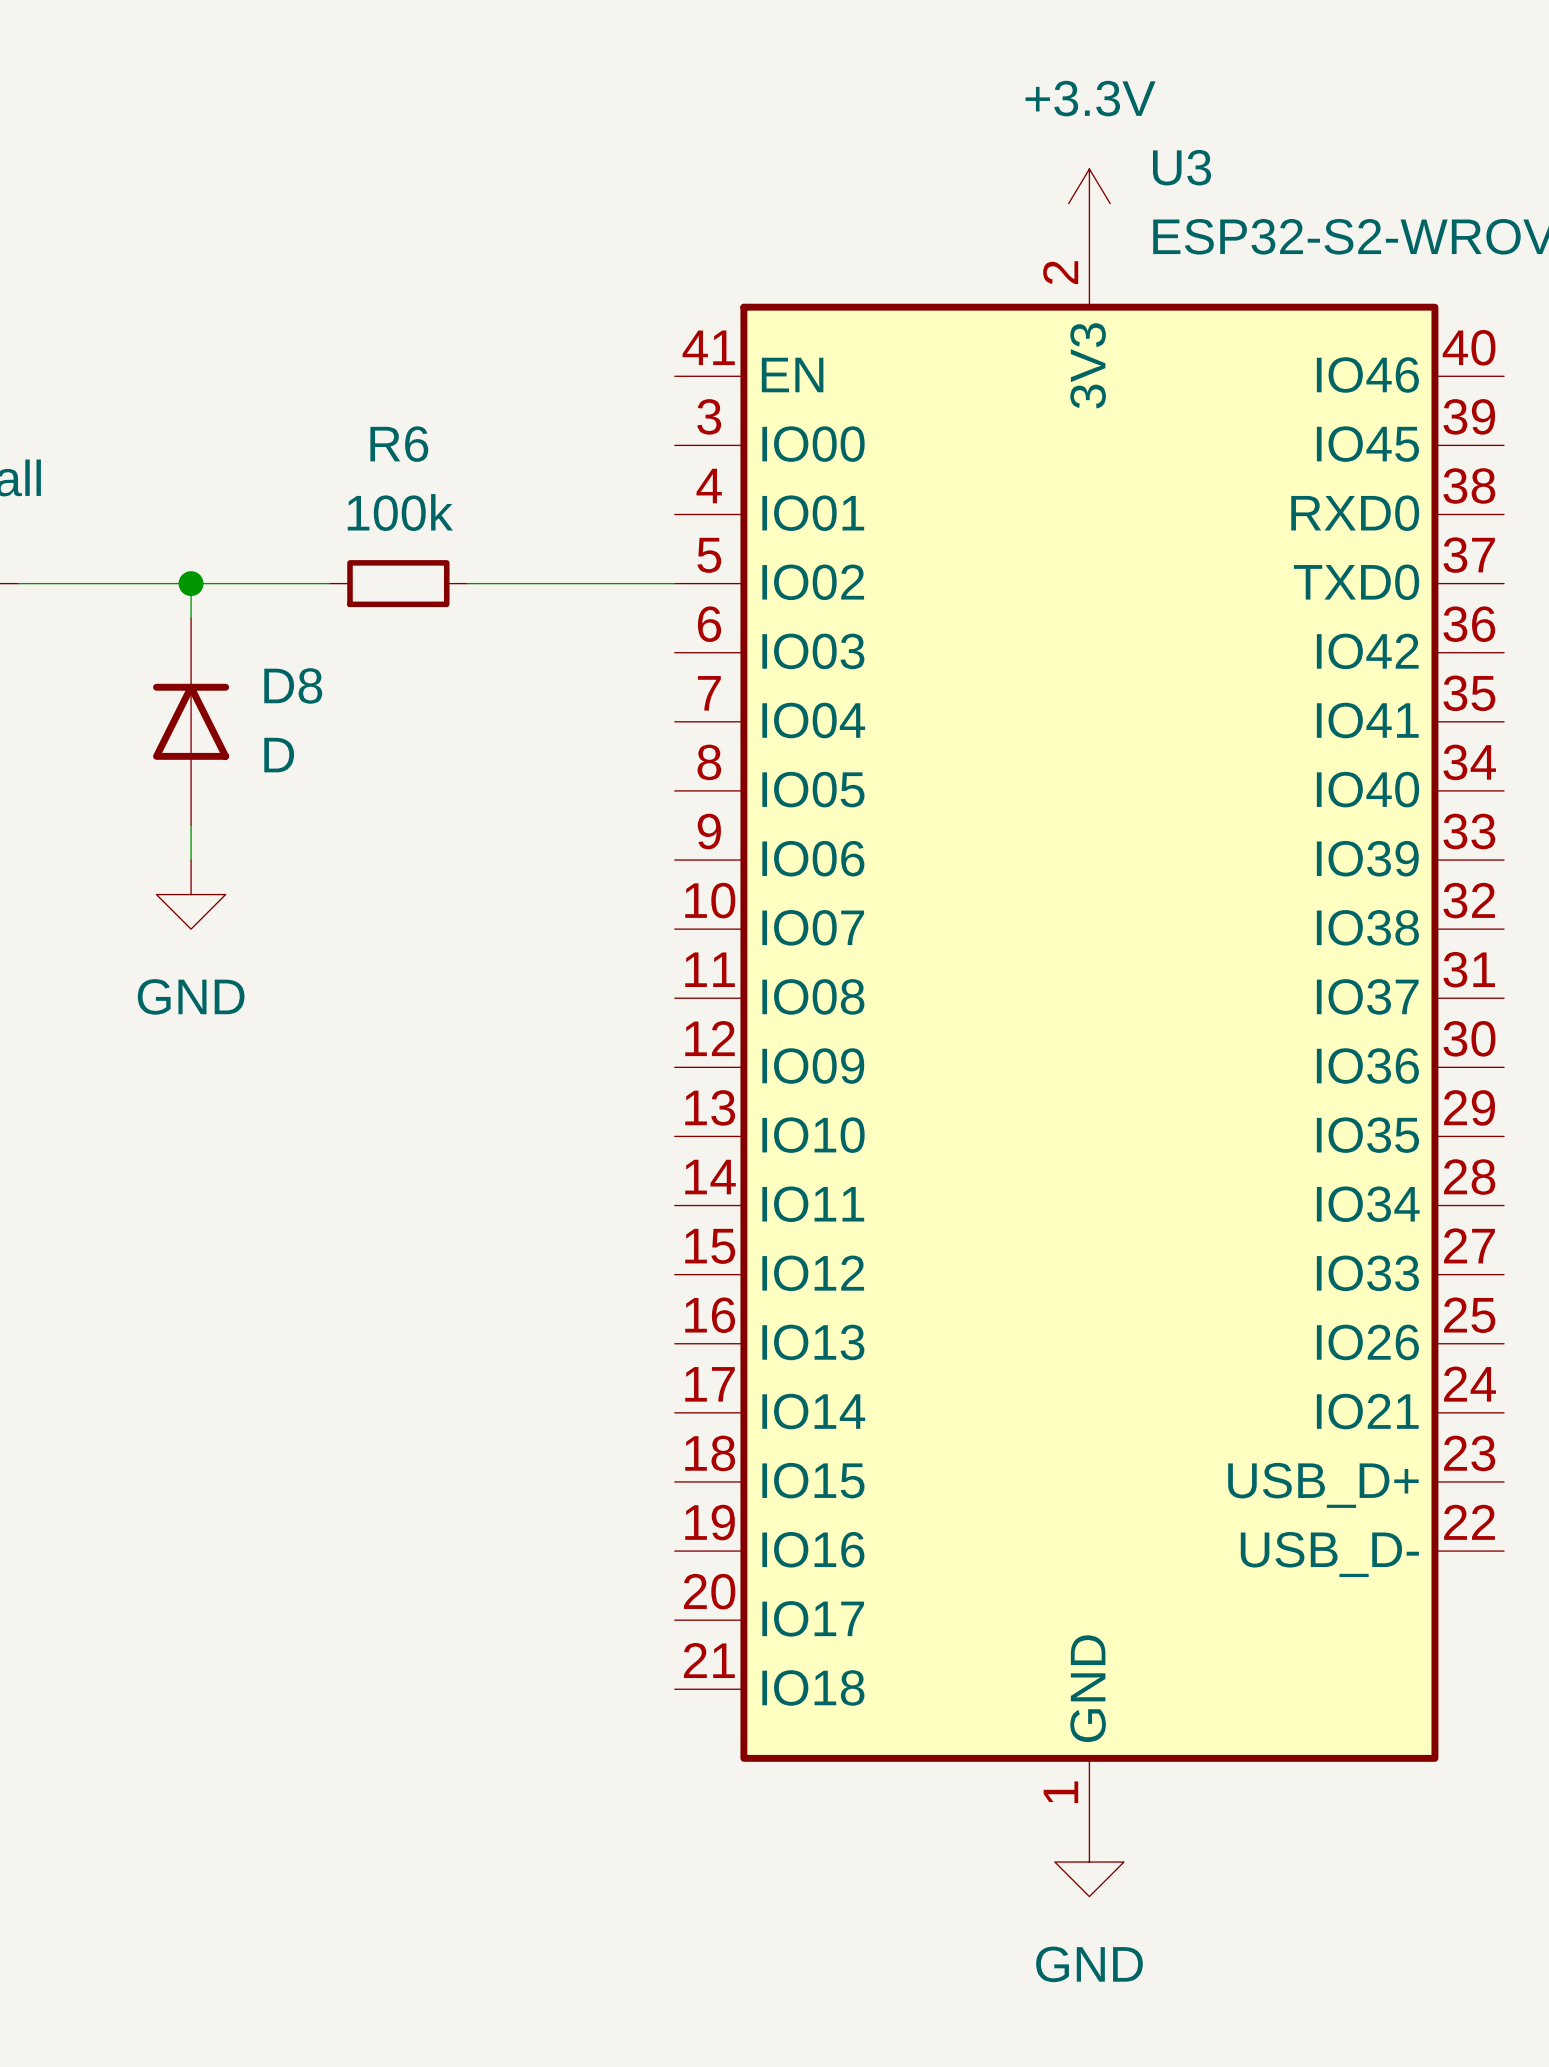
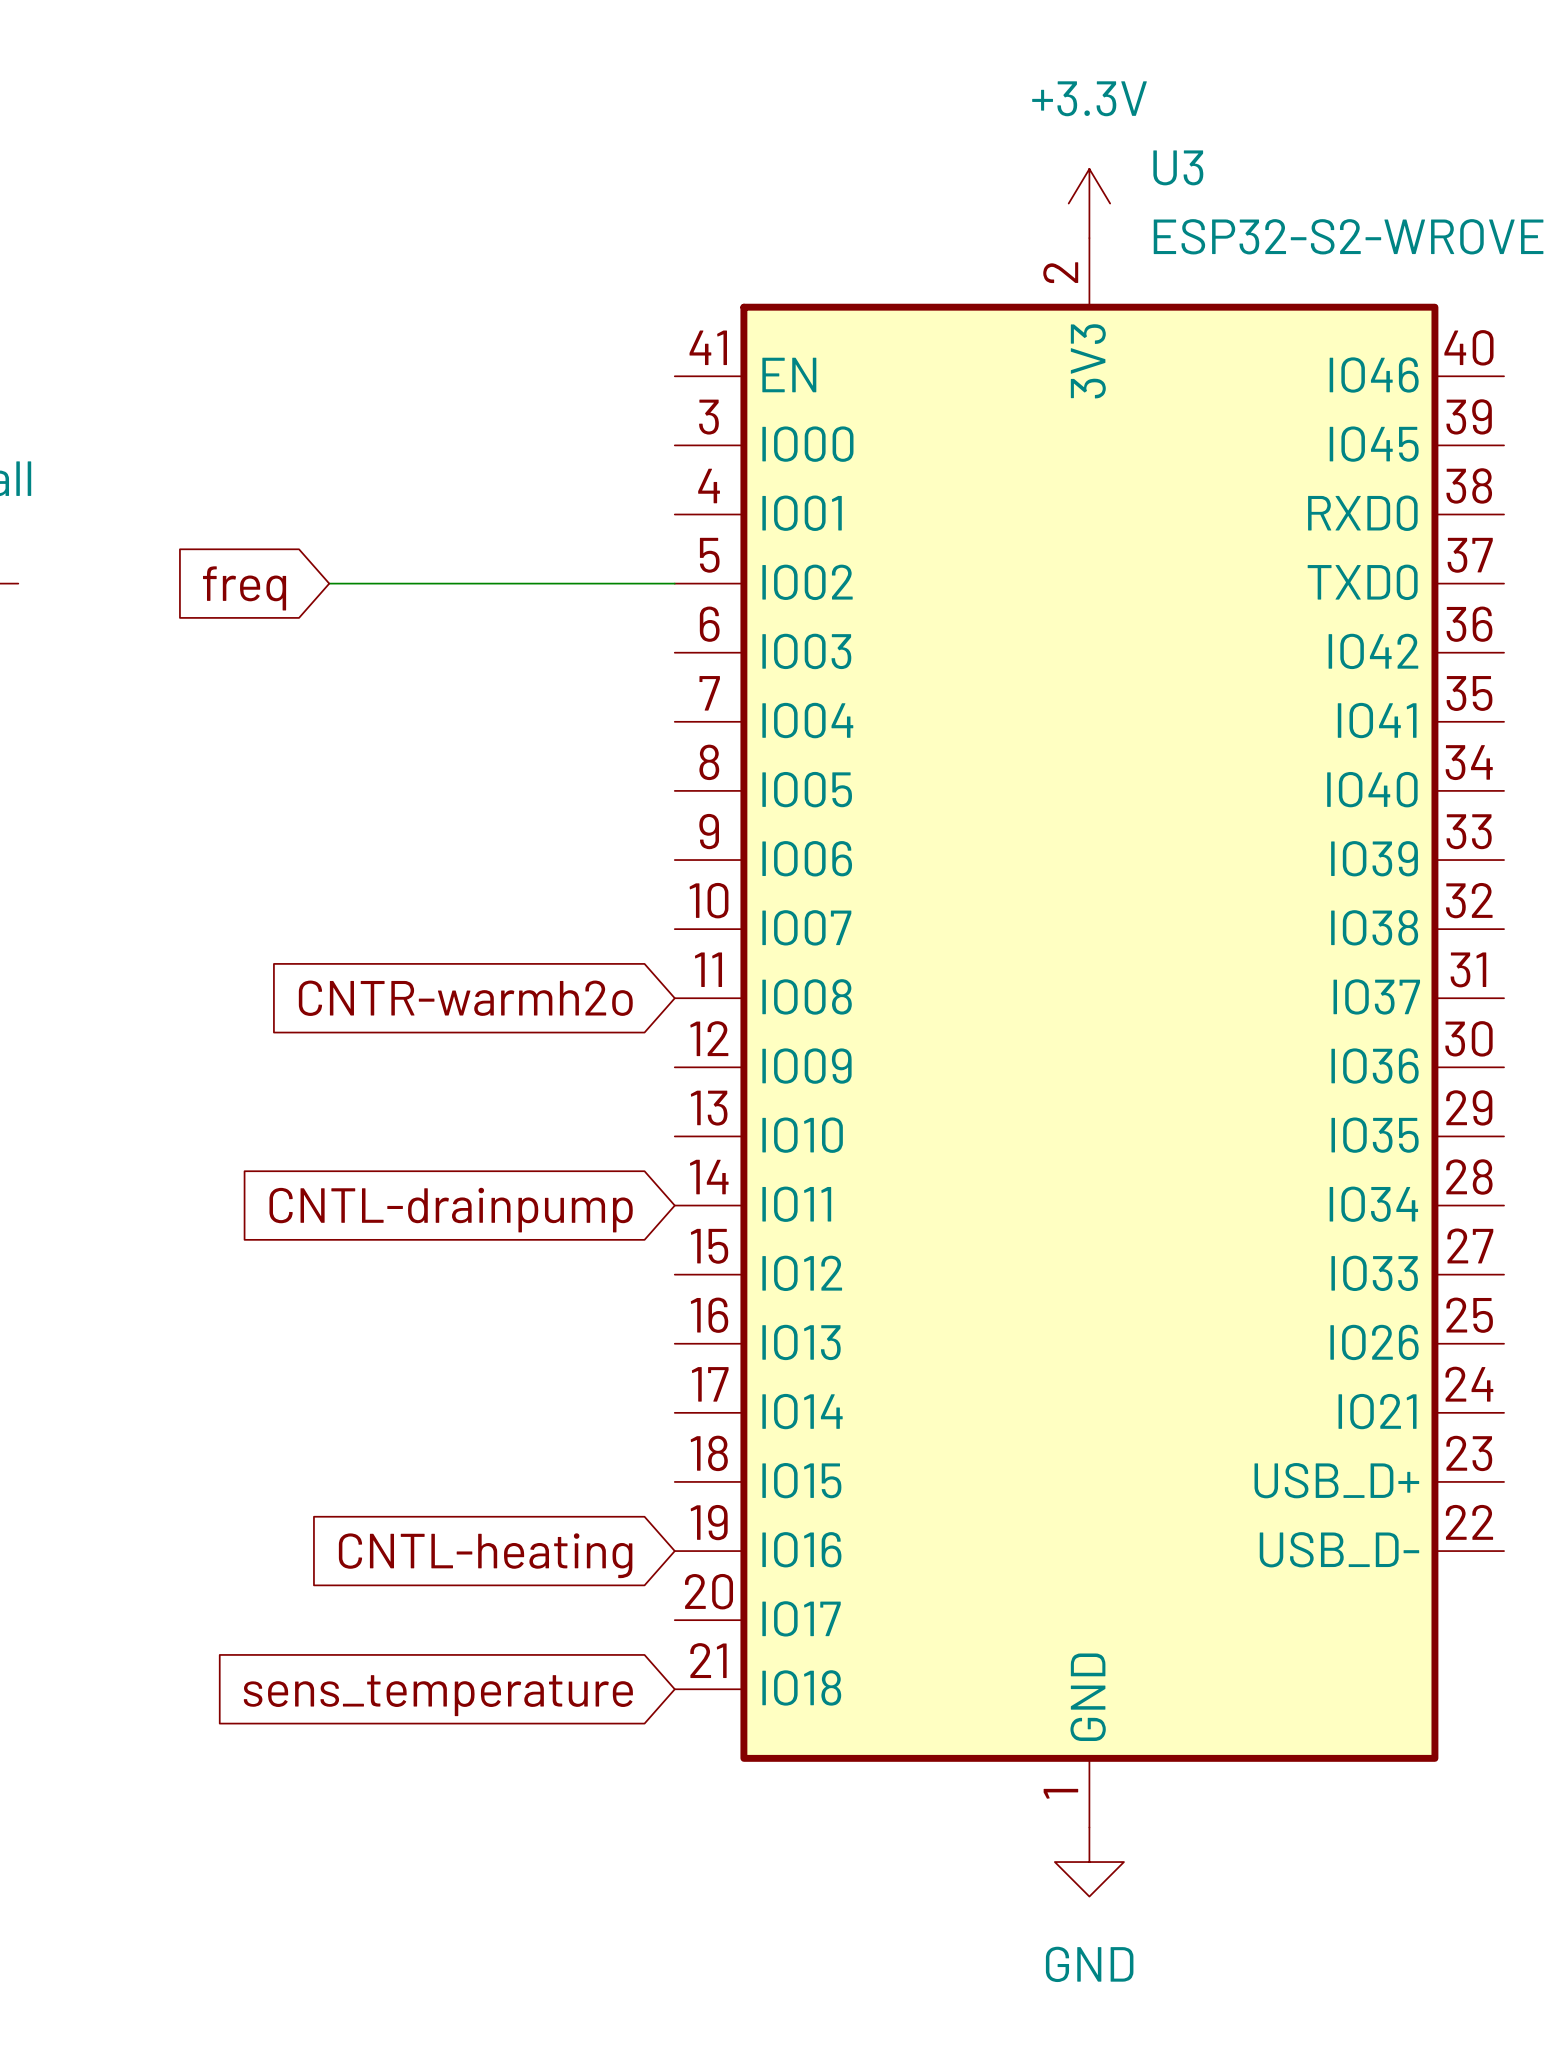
wire: (18, 583) (329, 583) -> (467, 583) (329, 583)
wire: (191, 583) (191, 618) -> none
junction: (191, 583) -> none
R6: 100k (398, 583) -> none
global label: none -> freq (244, 588)
D8: D (191, 721) -> none
wire: (191, 825) (191, 860) -> none
power symbol: GND (191, 894) -> none
global label: none -> CNTR-warmh2o (465, 998)
global label: none -> CNTL-drainpump (451, 1210)
global label: none -> CNTL-heating (485, 1555)
global label: none -> sens_temperature (438, 1695)

